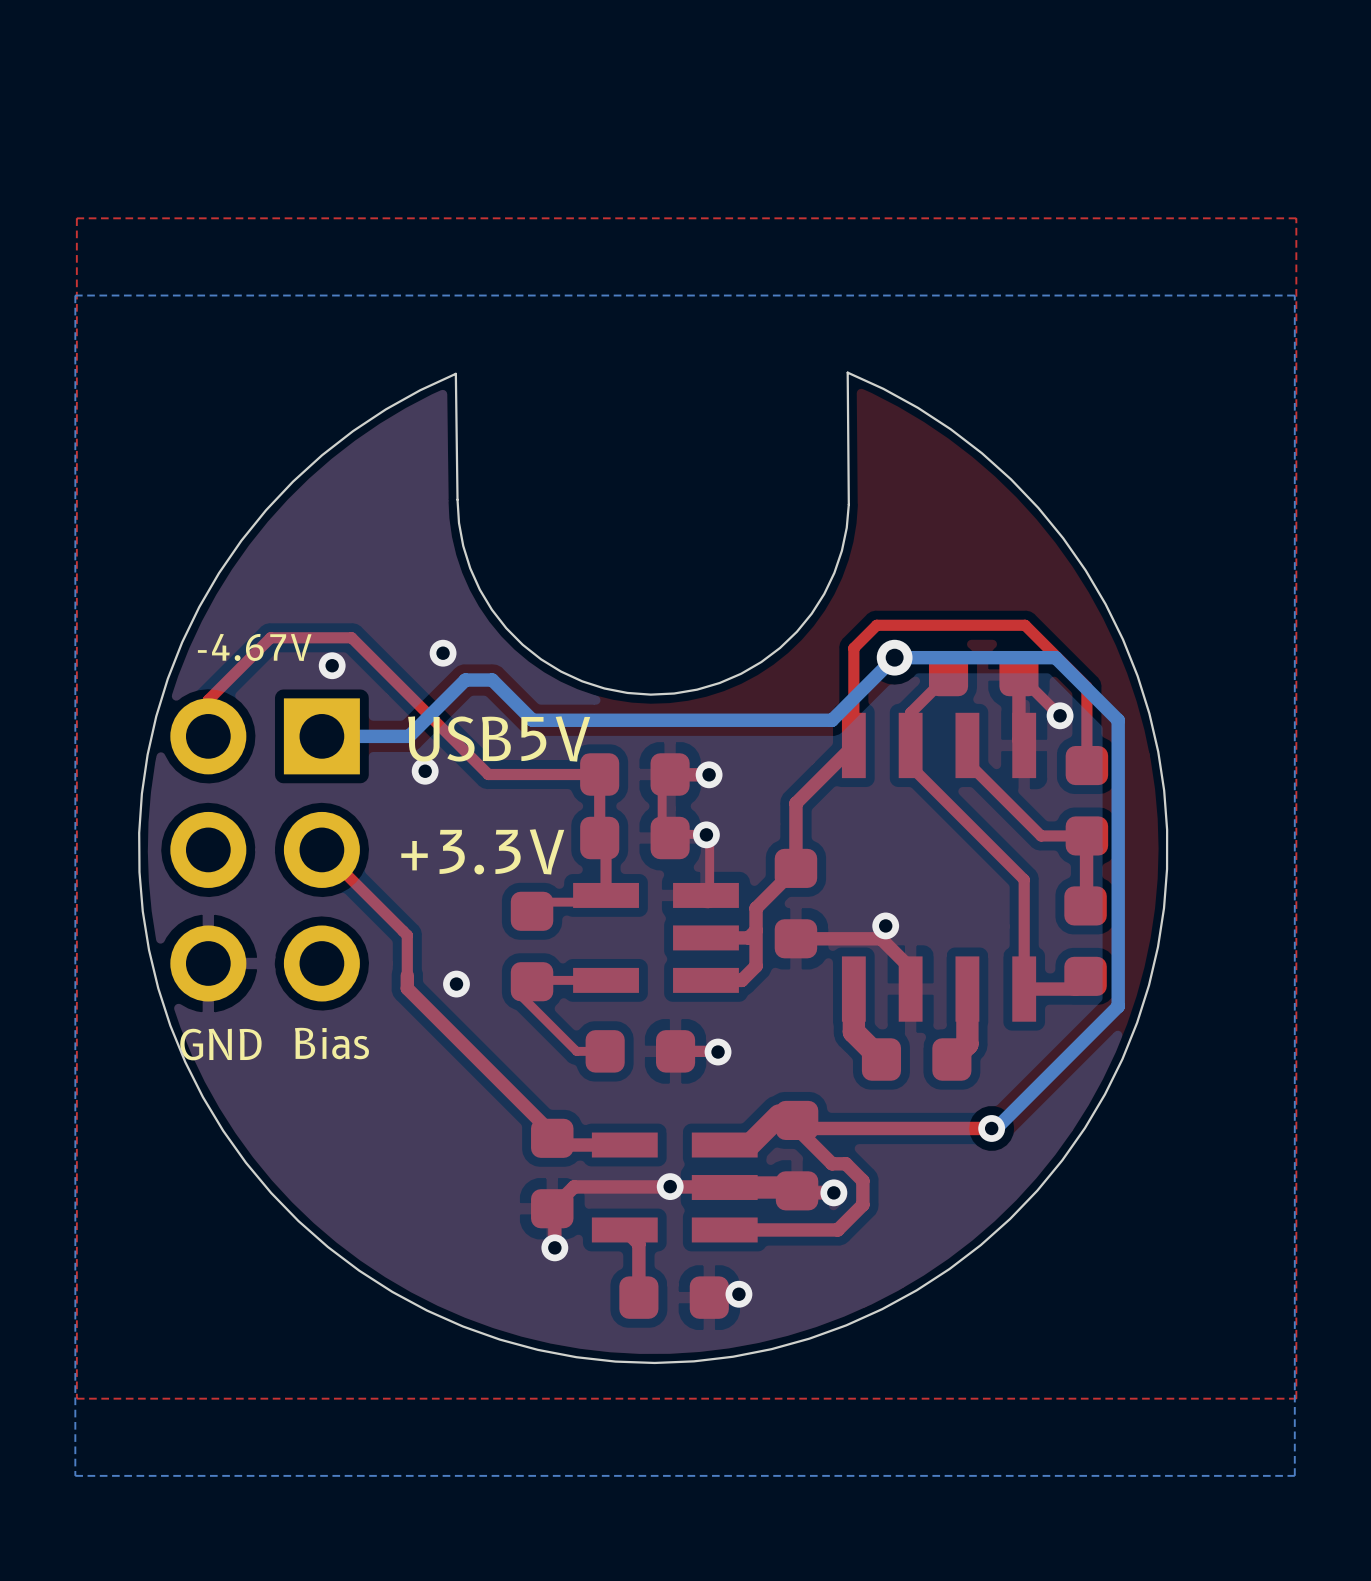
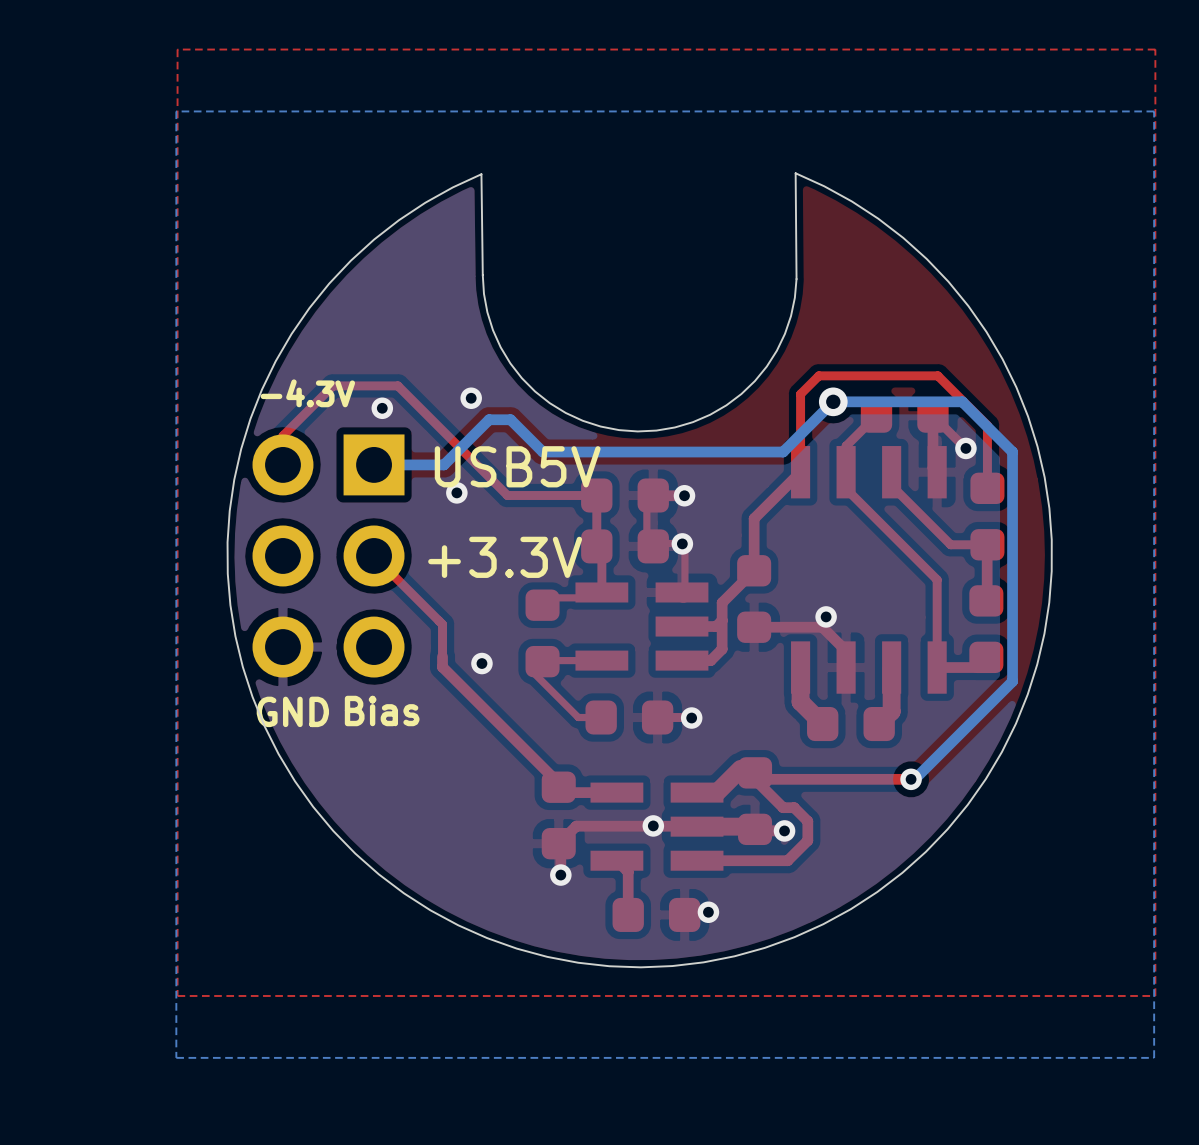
text: -4.67V (254, 647) -> -4.3V (307, 393)

